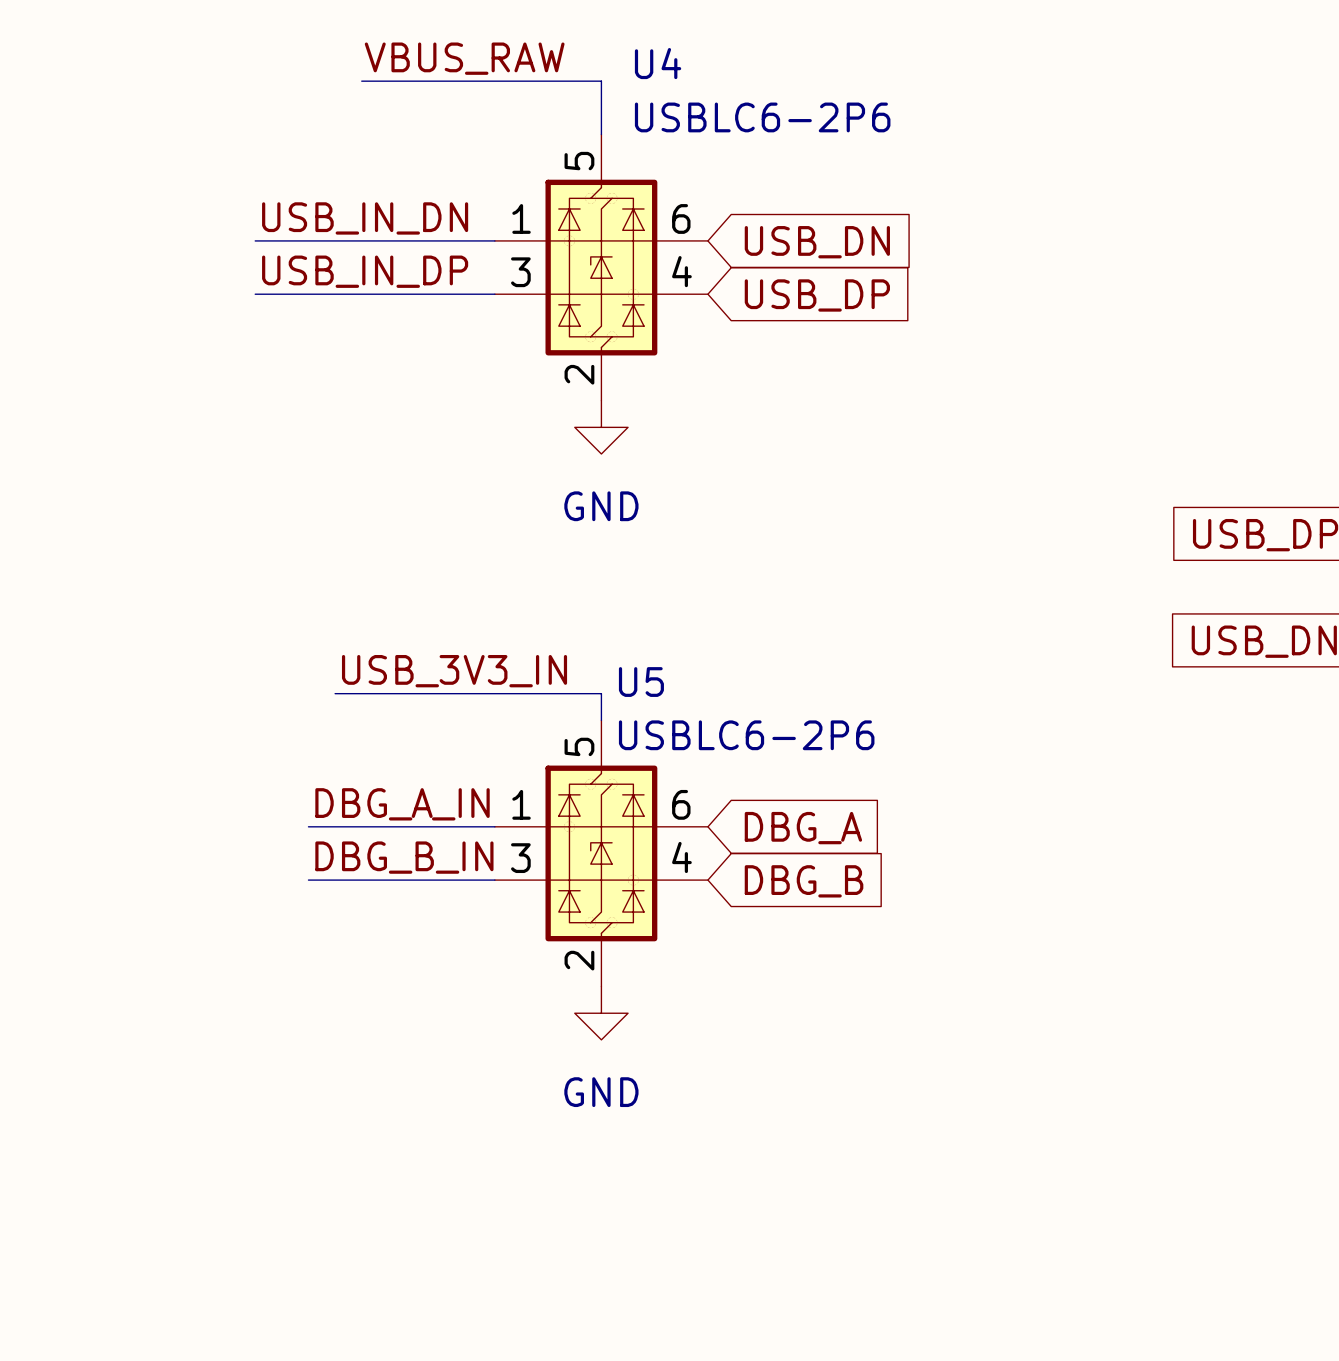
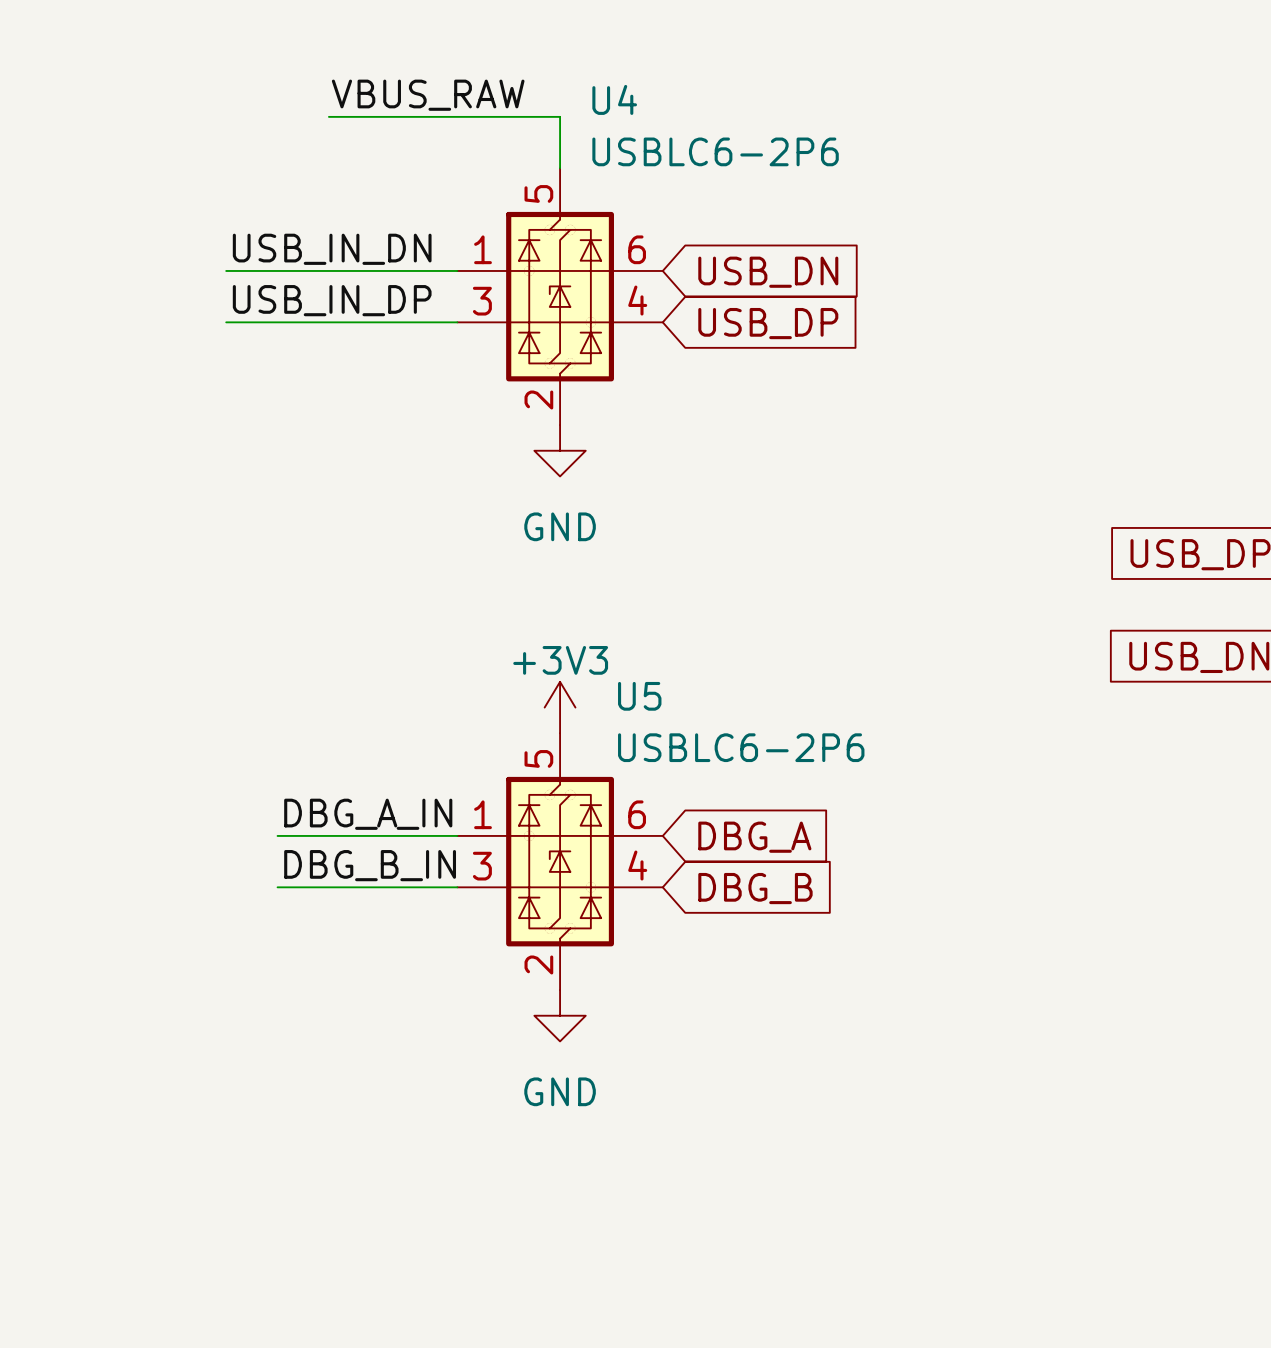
label: USB_3V3_IN (454, 671) -> none
U5 name position: U5 (641, 682) -> U5 (639, 696)
wire: (335, 693) (601, 693) (601, 720) -> none
power symbol: none -> +3V3 (560, 707)
U5 value position: USBLC6-2P6 (746, 735) -> USBLC6-2P6 (741, 747)

